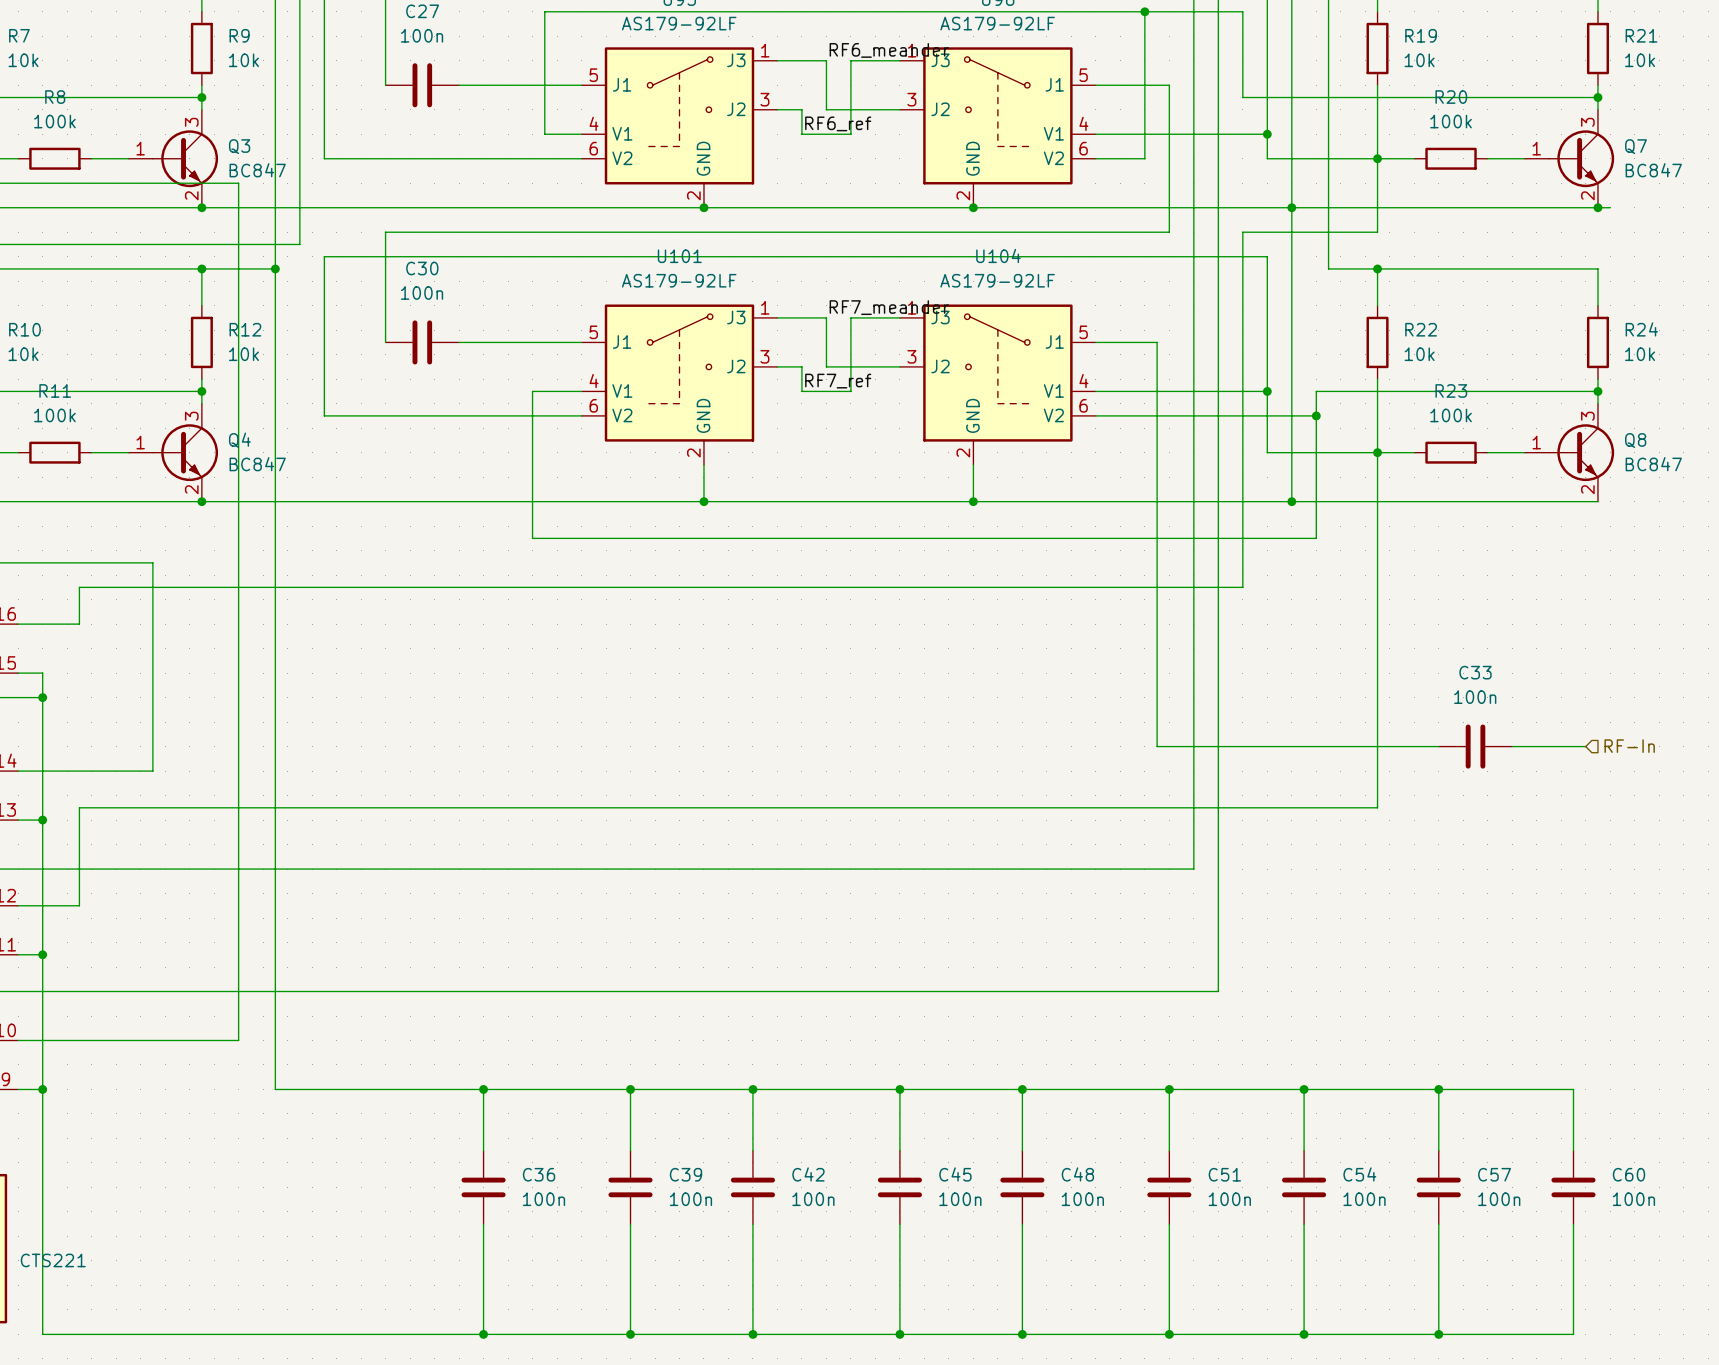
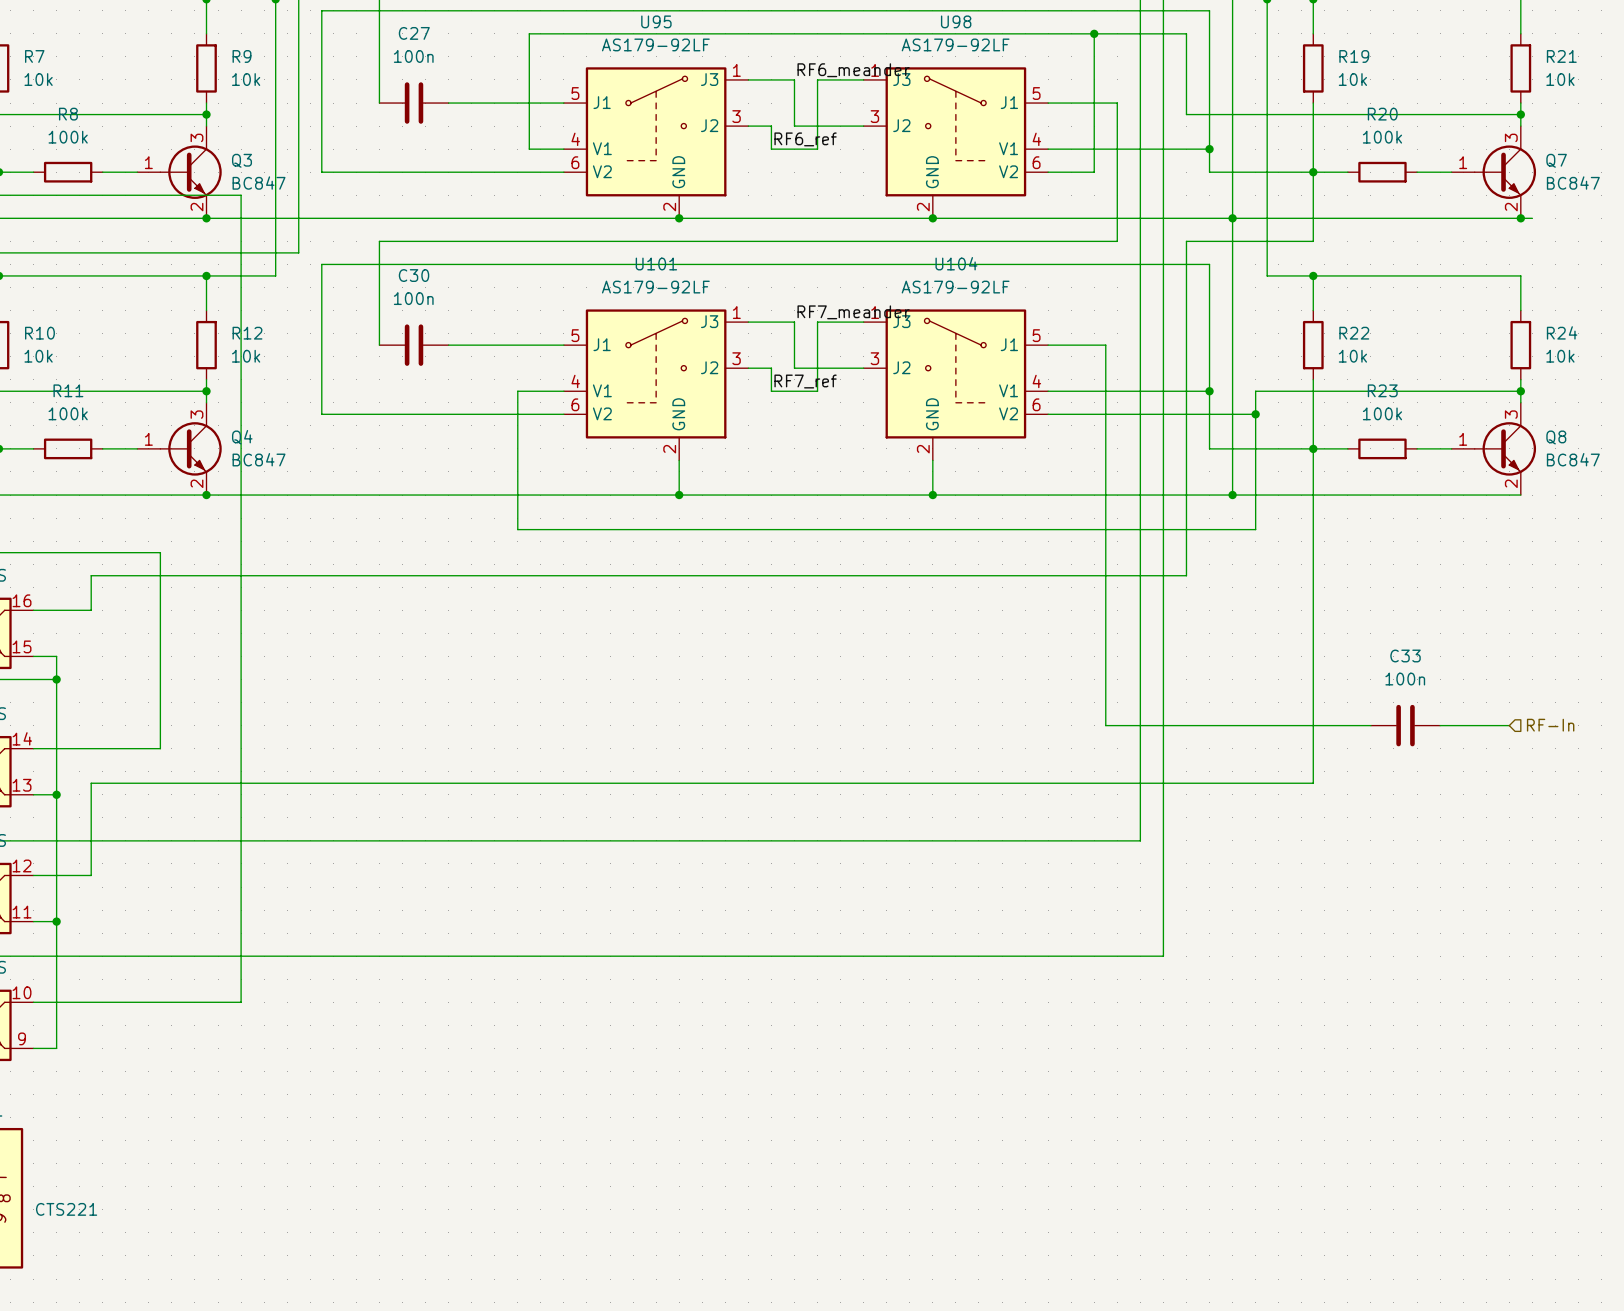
wire: (275, 268) (275, 1089) (1573, 1089) (1573, 1150) -> none
junction: (275, 268) -> none
wire: (42, 1089) (42, 1334) (1573, 1334) (1573, 1224) -> none
junction: (42, 1089) -> none
wire: (483, 1089) (483, 1150) -> none
junction: (483, 1089) -> none
wire: (630, 1089) (630, 1150) -> none
junction: (630, 1089) -> none
wire: (752, 1089) (752, 1150) -> none
junction: (752, 1089) -> none
wire: (899, 1089) (899, 1150) -> none
junction: (899, 1089) -> none
wire: (1022, 1089) (1022, 1150) -> none
junction: (1022, 1089) -> none
wire: (1169, 1089) (1169, 1150) -> none
junction: (1169, 1089) -> none
wire: (1304, 1089) (1304, 1150) -> none
junction: (1304, 1089) -> none
wire: (1438, 1089) (1438, 1150) -> none
junction: (1438, 1089) -> none
C36: 100n (483, 1187) -> none
C39: 100n (630, 1187) -> none
C42: 100n (752, 1187) -> none
C45: 100n (899, 1187) -> none
C48: 100n (1022, 1187) -> none
C51: 100n (1169, 1187) -> none
C54: 100n (1304, 1187) -> none
C57: 100n (1438, 1187) -> none
C60: 100n (1573, 1187) -> none
wire: (483, 1224) (483, 1334) -> none
wire: (630, 1224) (630, 1334) -> none
wire: (752, 1224) (752, 1334) -> none
wire: (899, 1224) (899, 1334) -> none
wire: (1022, 1224) (1022, 1334) -> none
wire: (1169, 1224) (1169, 1334) -> none
wire: (1304, 1224) (1304, 1334) -> none
wire: (1438, 1224) (1438, 1334) -> none
junction: (483, 1334) -> none
junction: (630, 1334) -> none
junction: (752, 1334) -> none
junction: (899, 1334) -> none
junction: (1022, 1334) -> none
junction: (1169, 1334) -> none
junction: (1304, 1334) -> none
junction: (1438, 1334) -> none

